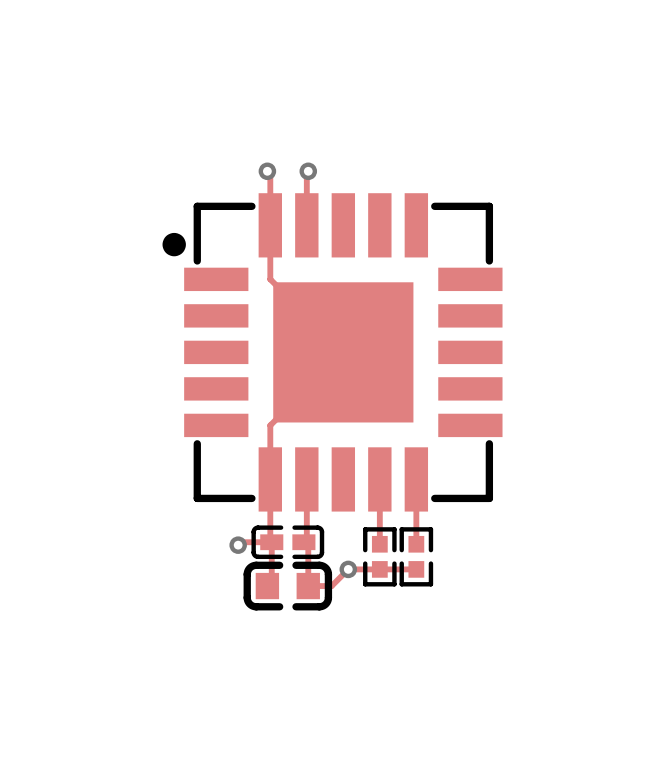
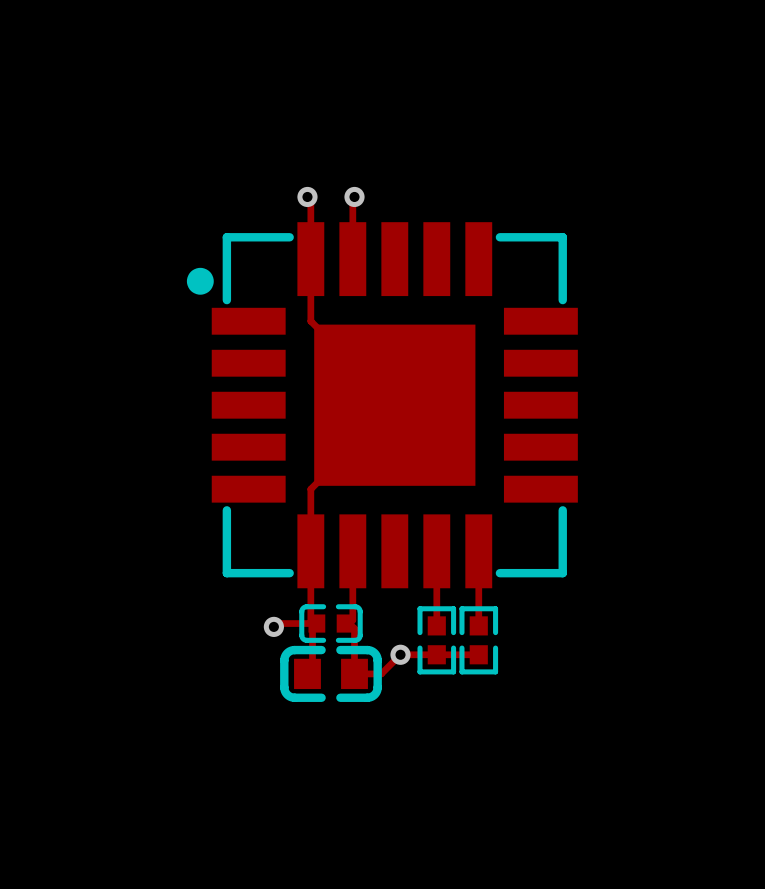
part footprint: [251, 525, 325, 560] -> [299, 604, 363, 643]

